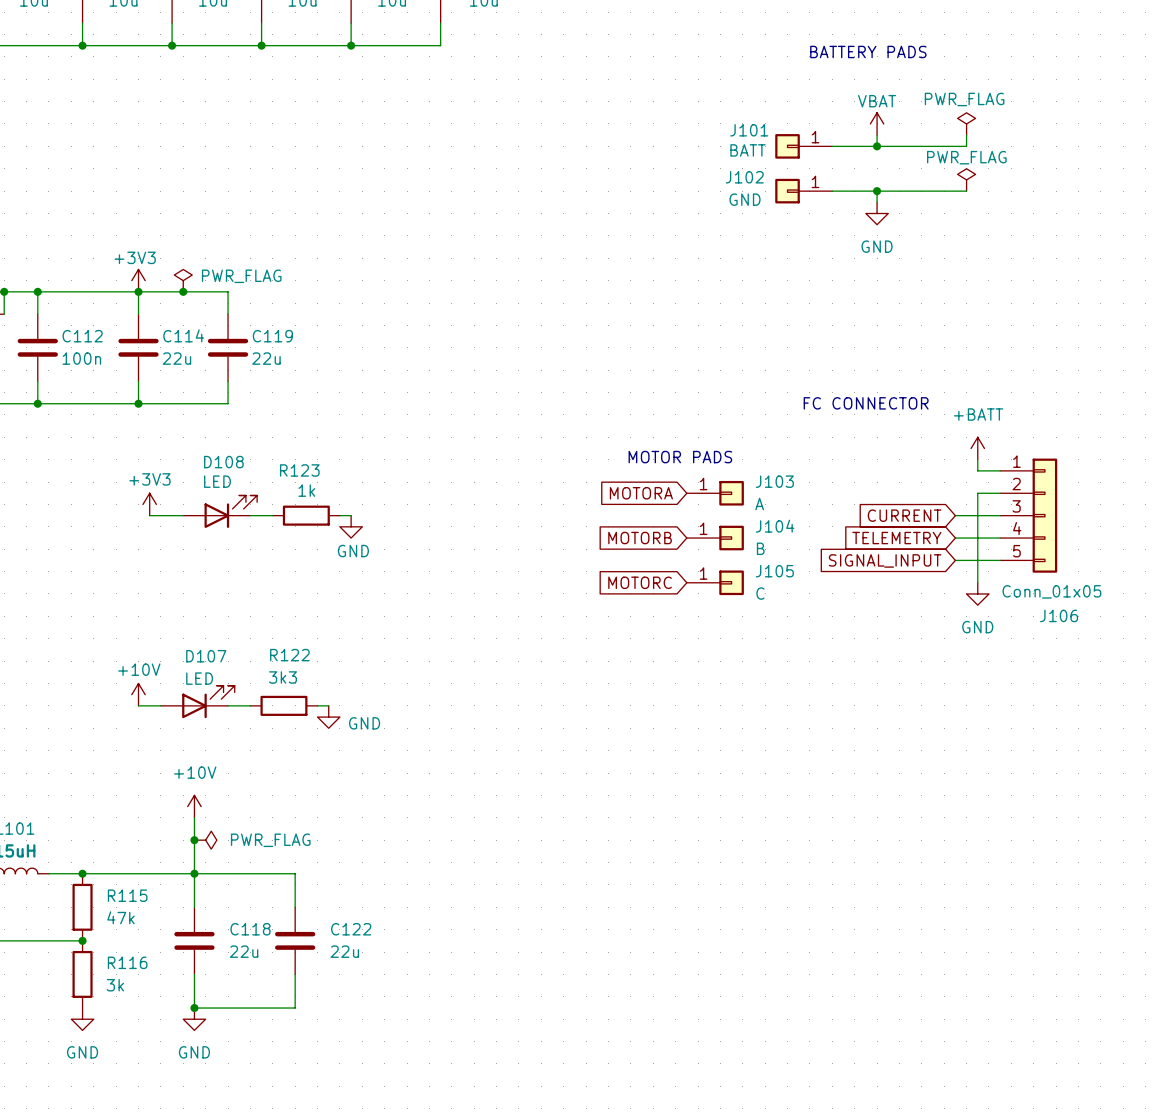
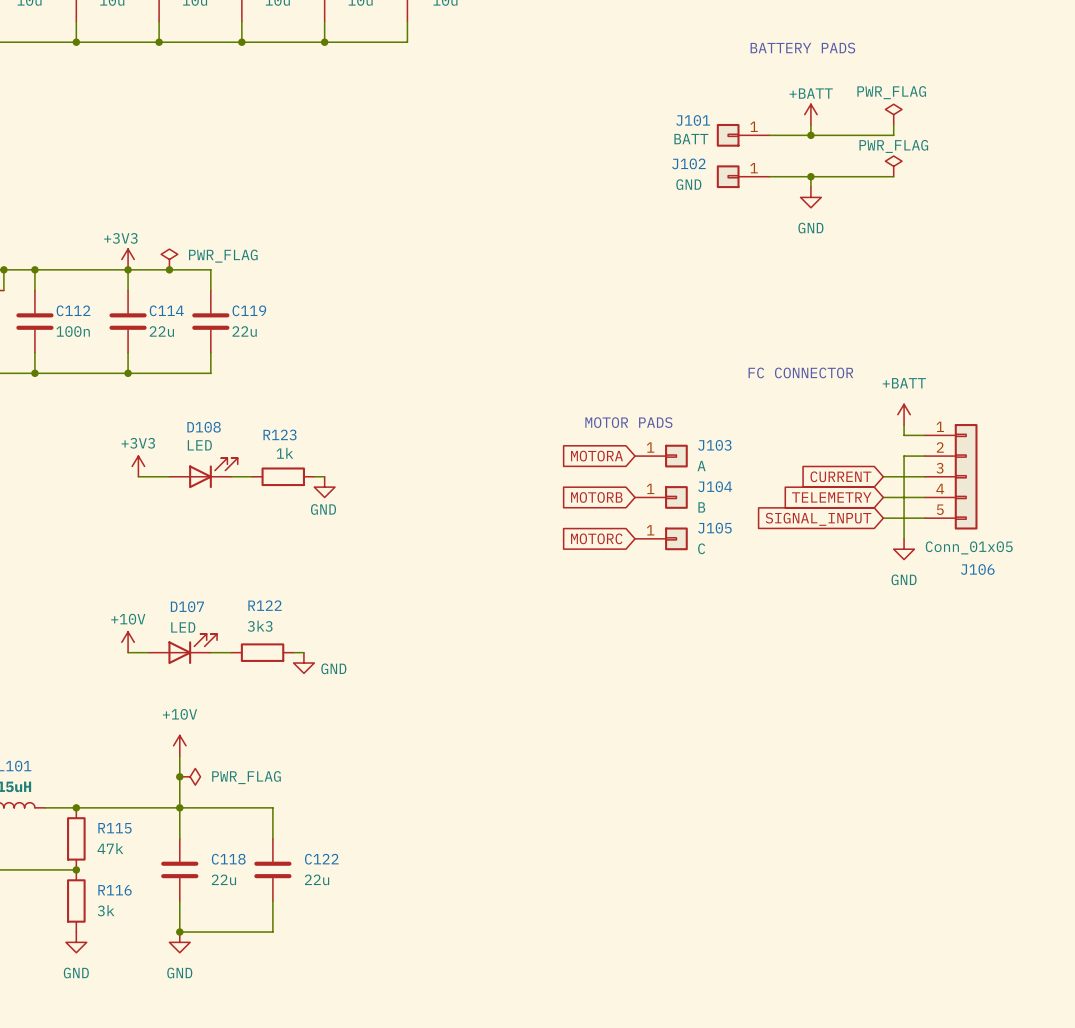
power symbol: VBAT (877, 123) -> +BATT (810, 114)

